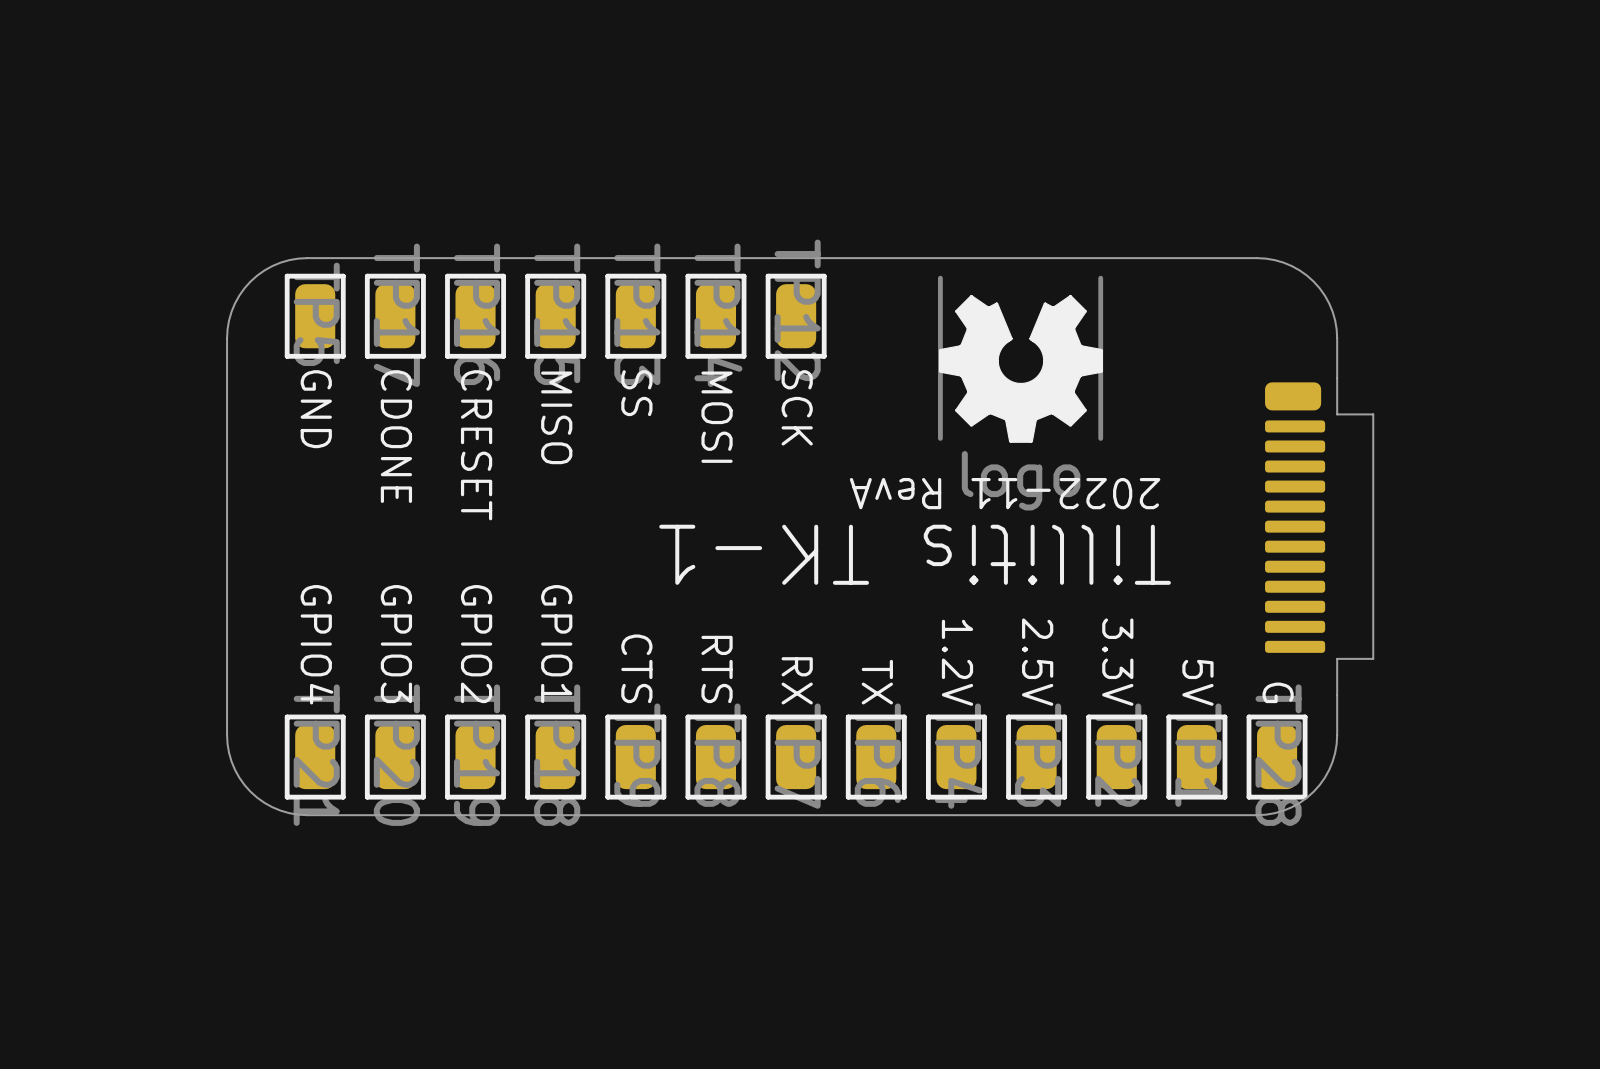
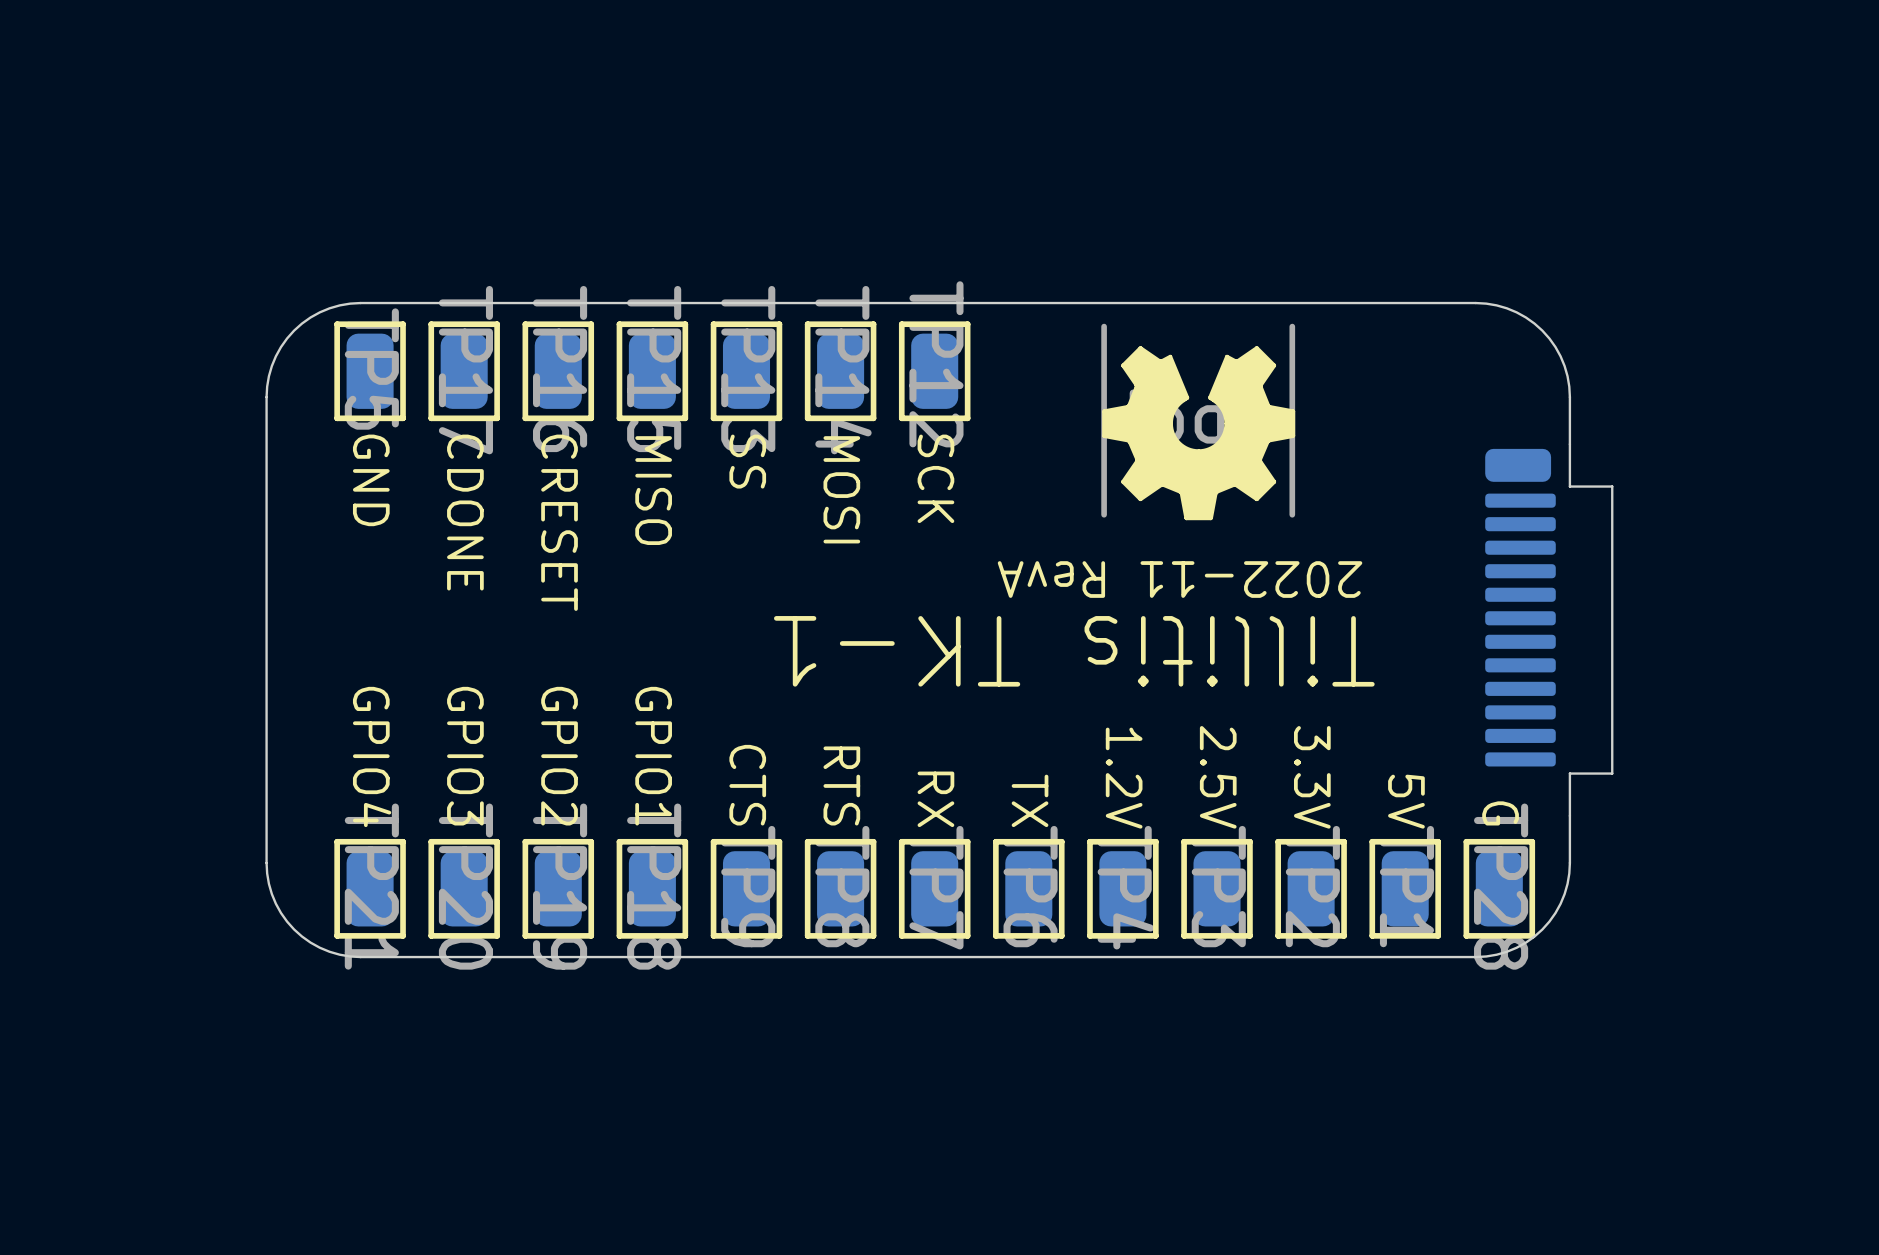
drawing shape: [938, 275, 1104, 511] -> [1101, 323, 1296, 520]

